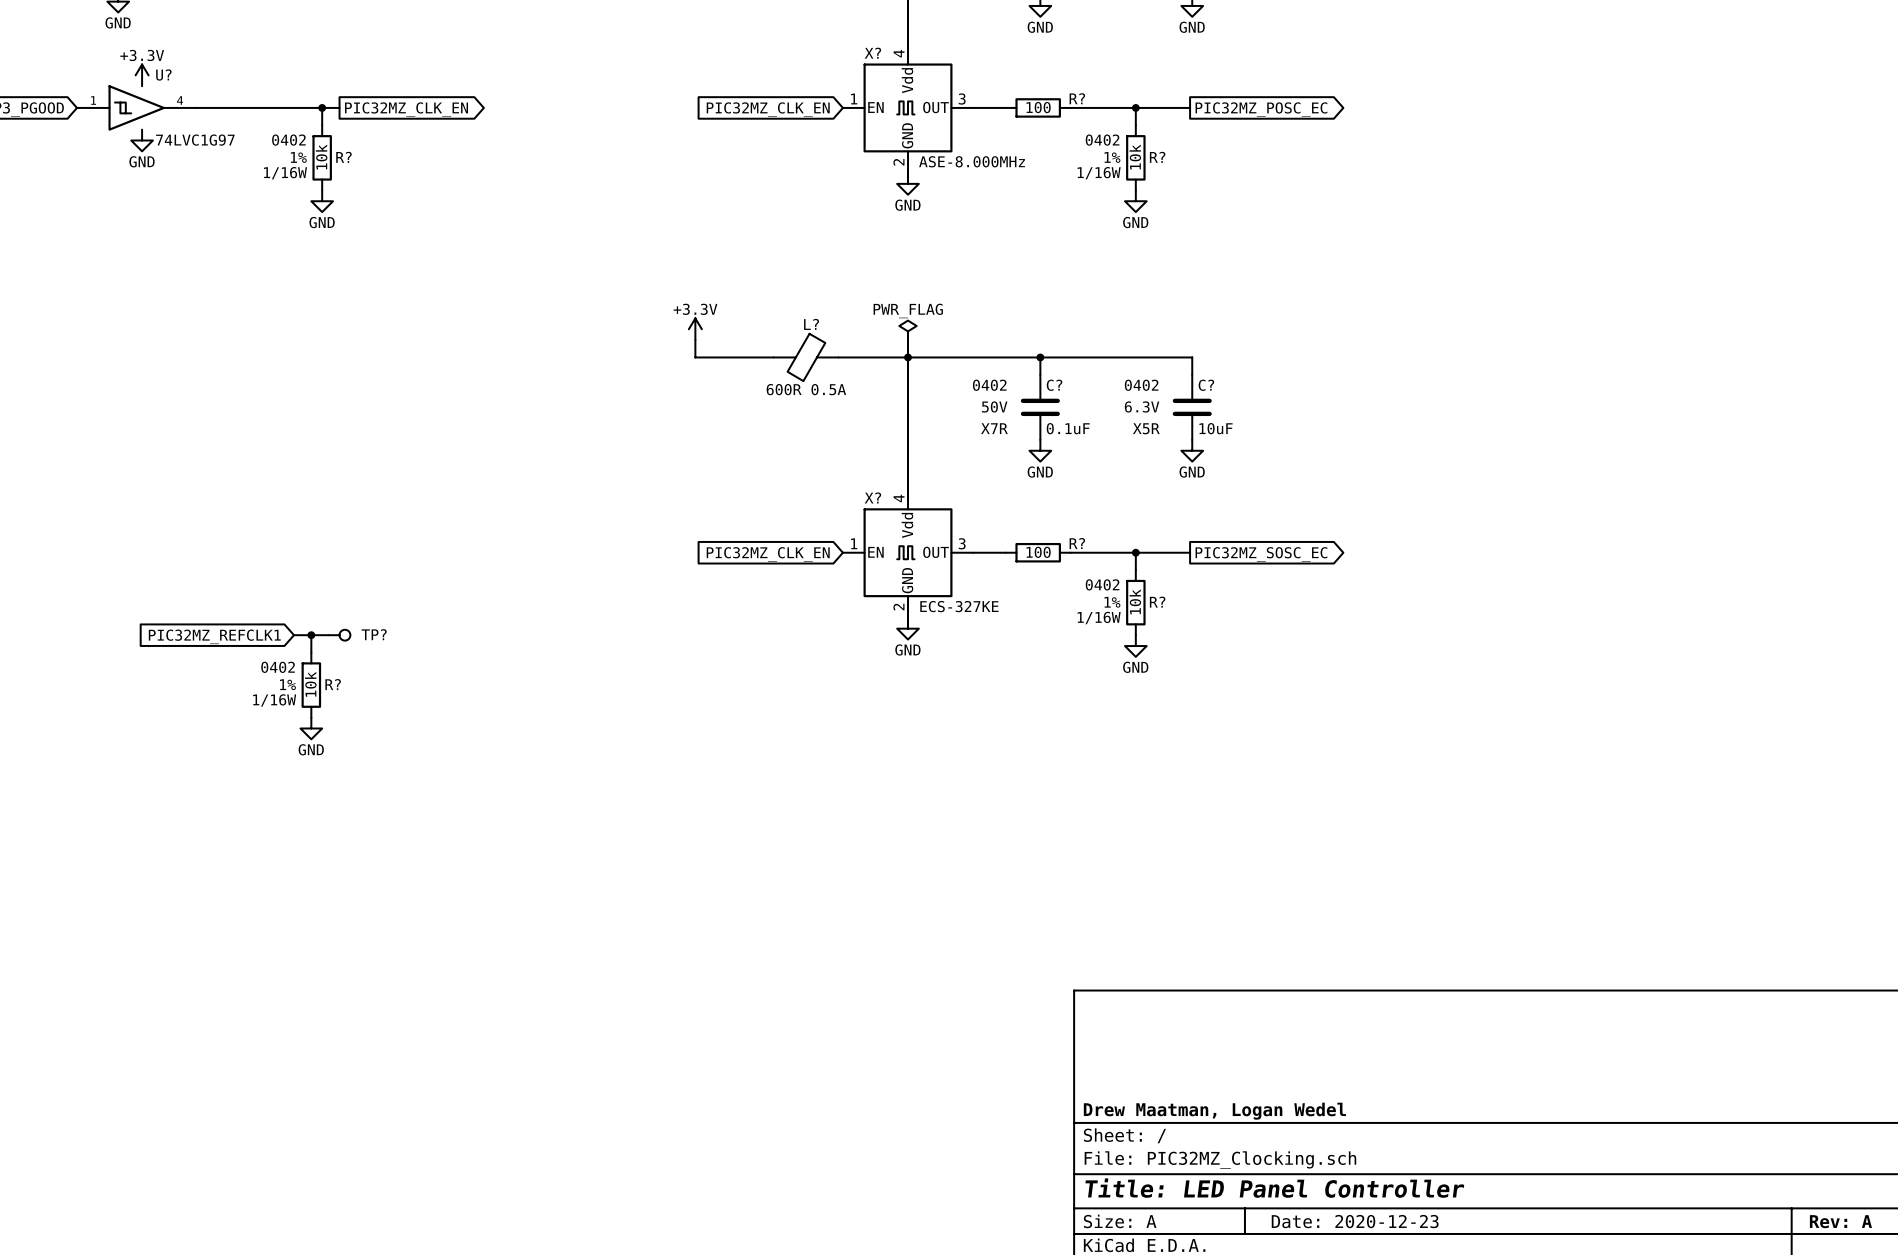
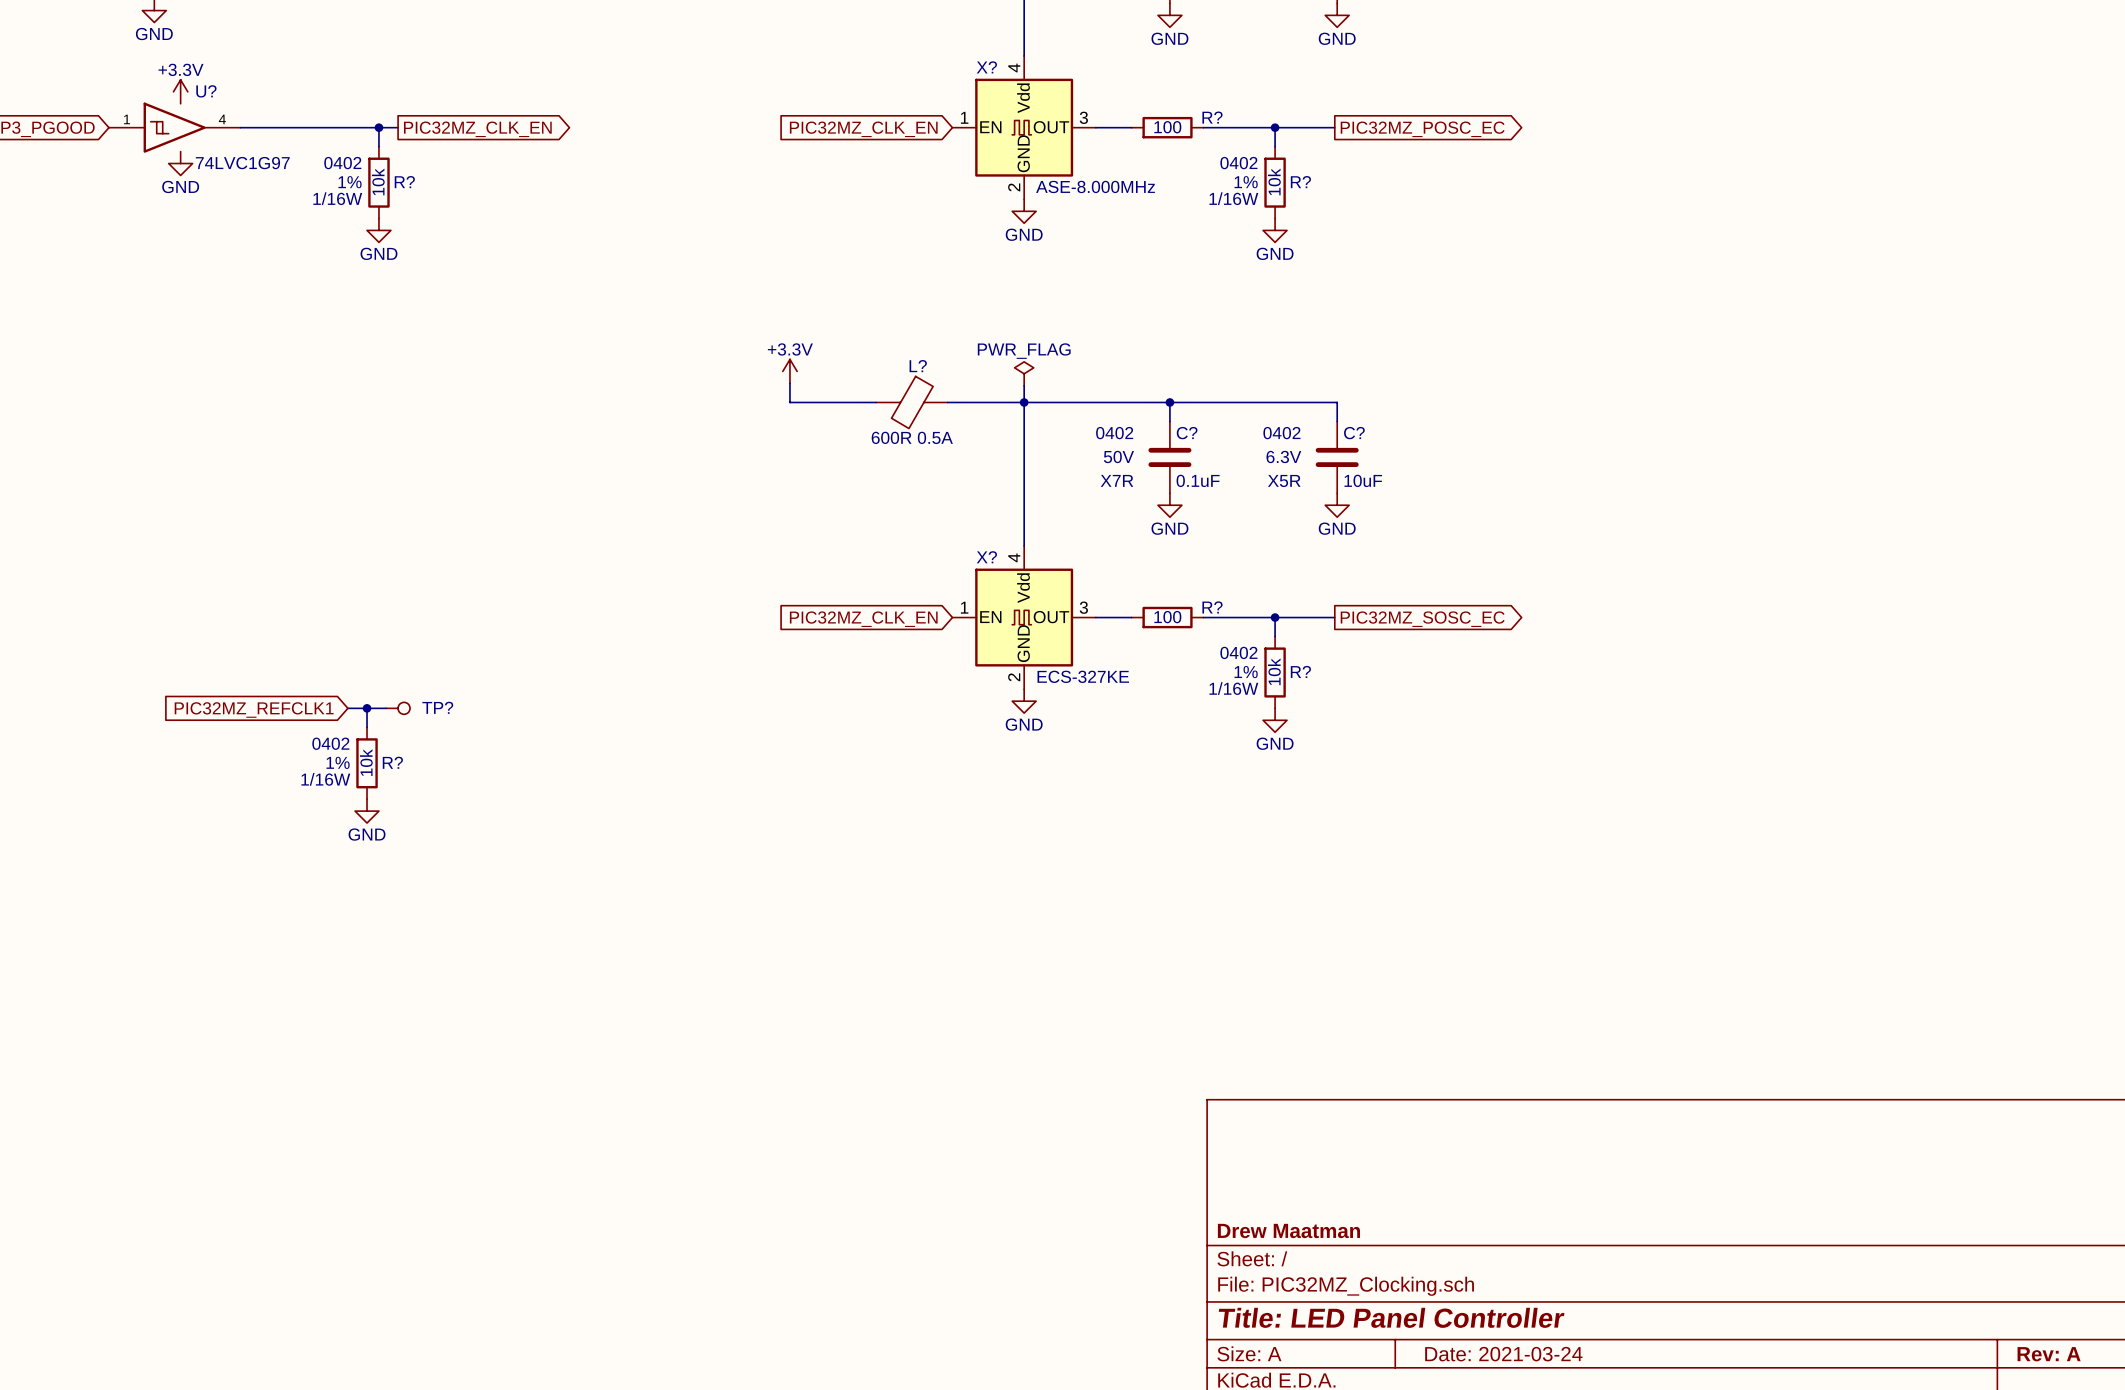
title block: Drew Maatman, Logan Wedel (1214, 1111) -> Drew Maatman (1288, 1230)
title block: Date: 2020-12-23 (1355, 1221) -> Date: 2021-03-24 (1503, 1354)

